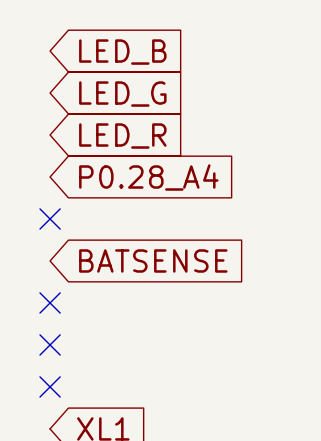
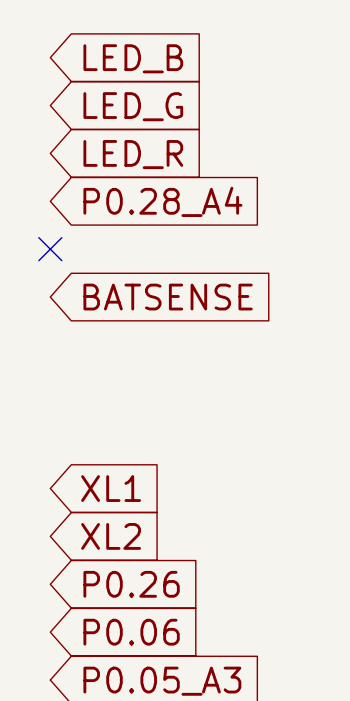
no-connect mark: (50, 302) -> none
no-connect mark: (50, 344) -> none
no-connect mark: (50, 386) -> none

